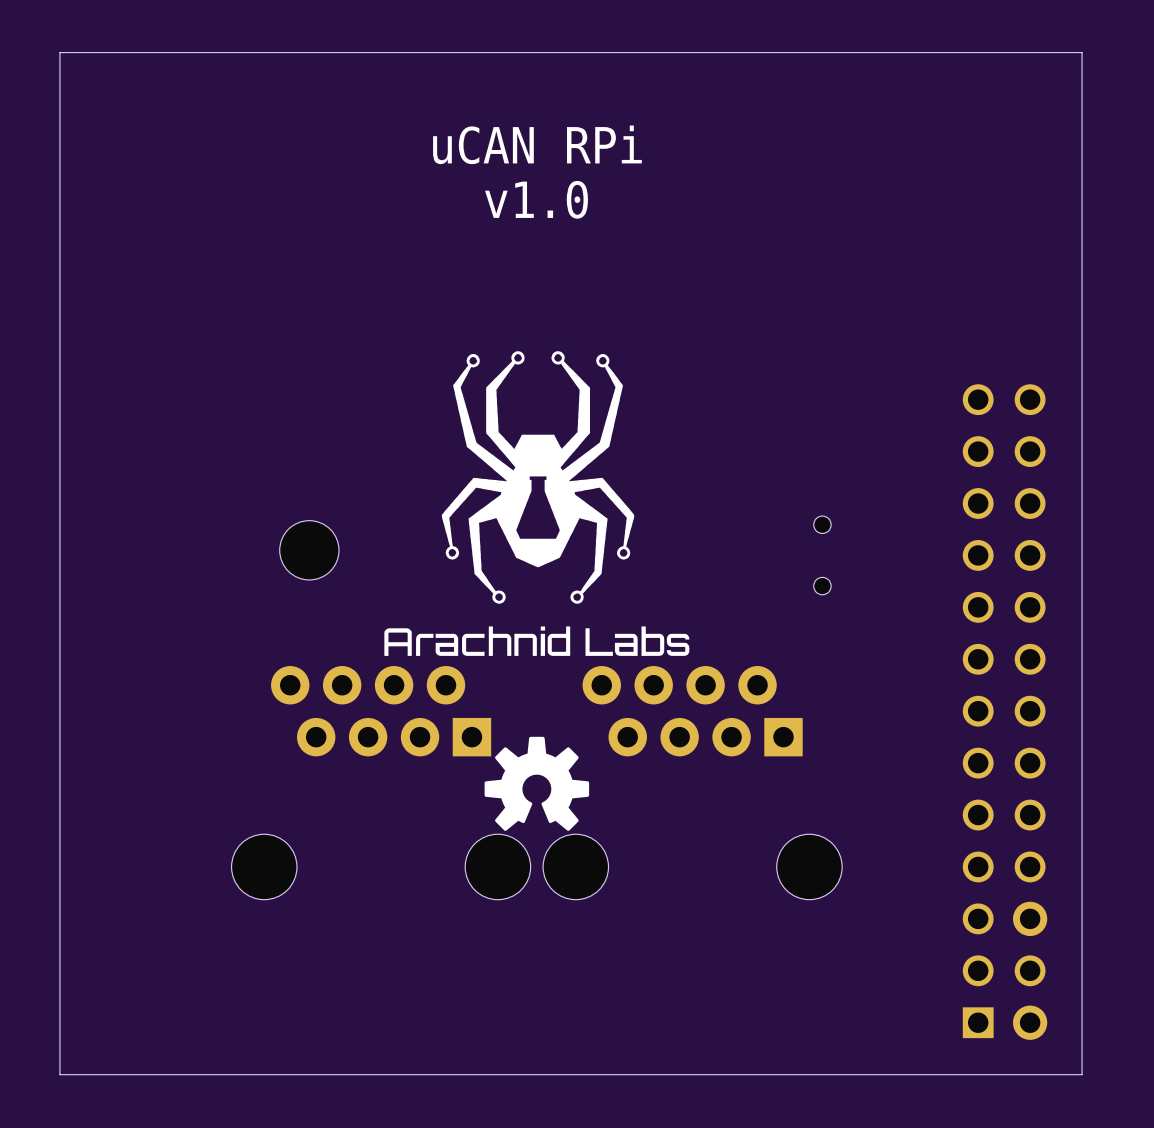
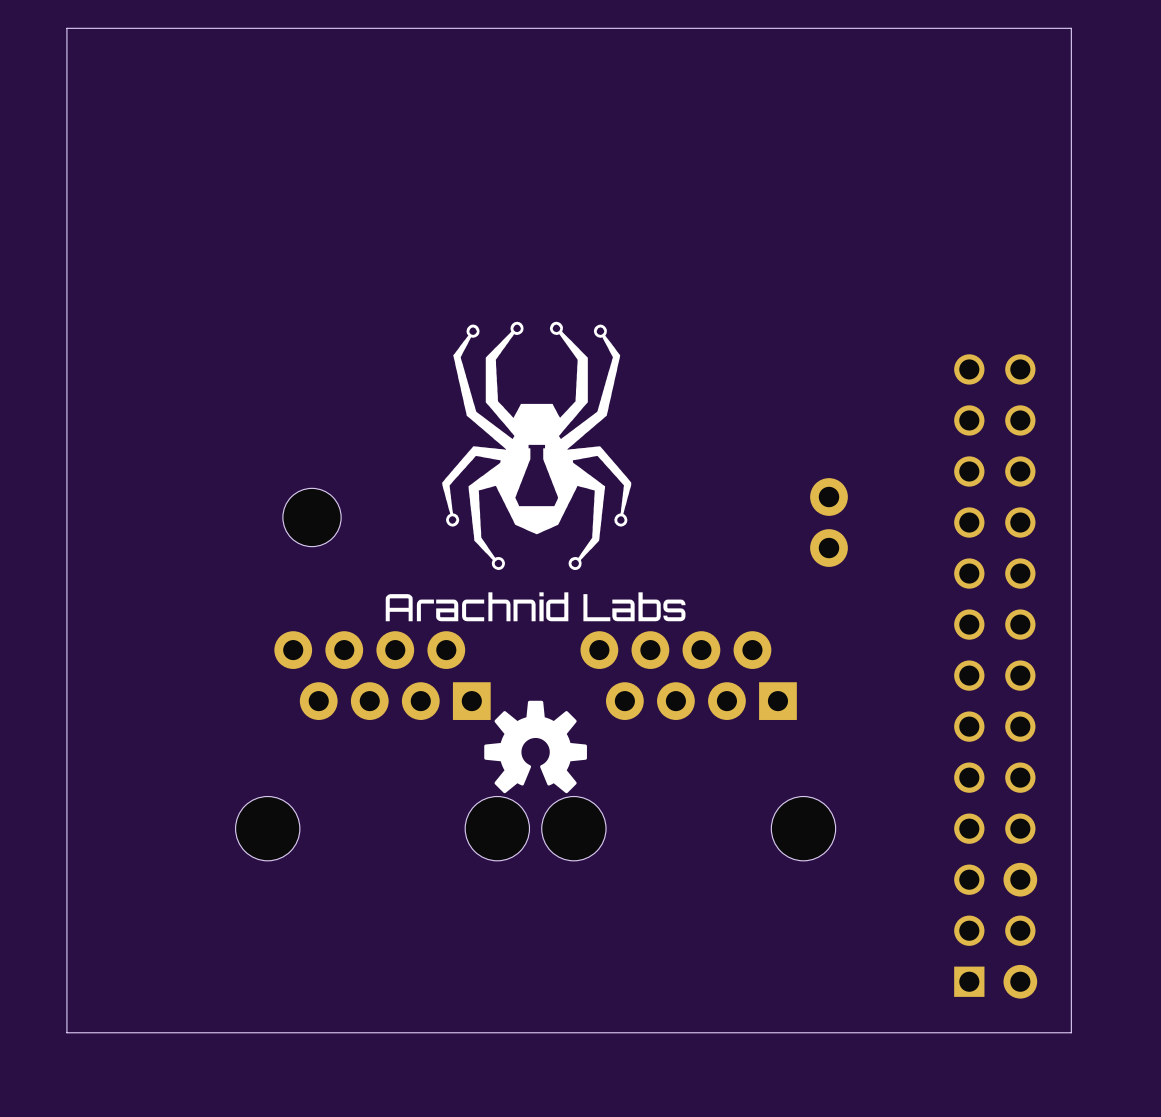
text: uCAN RPi (537, 144) -> none
text: v1.0 (536, 199) -> none
part footprint: [813, 516, 832, 595] -> [810, 478, 848, 567]

